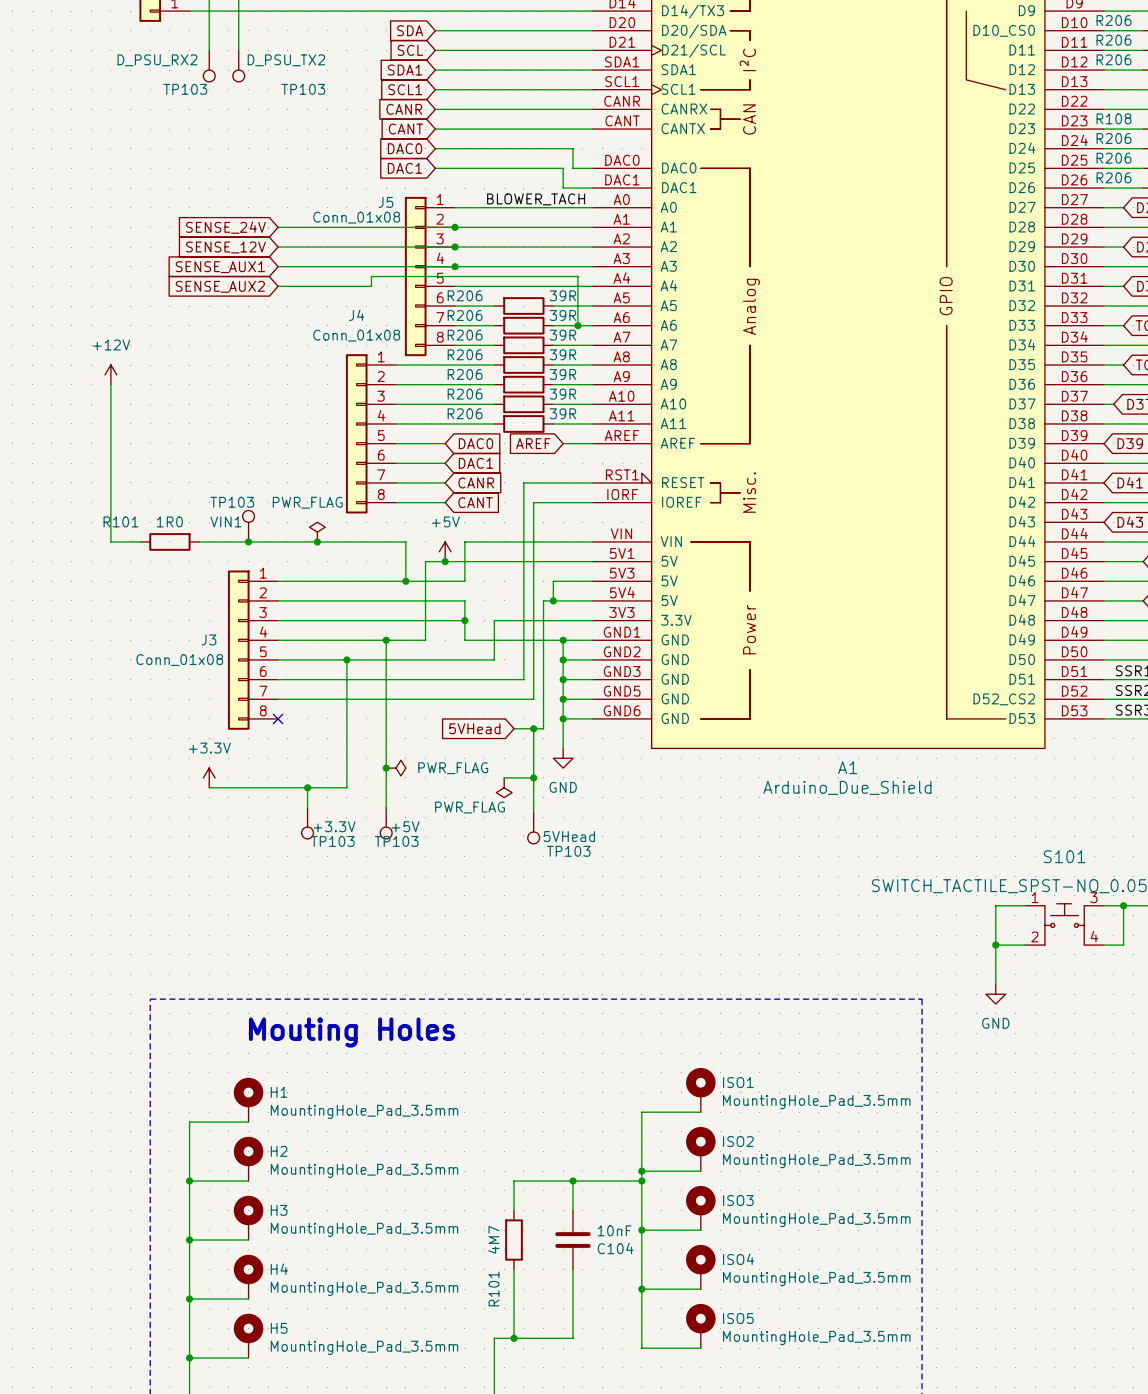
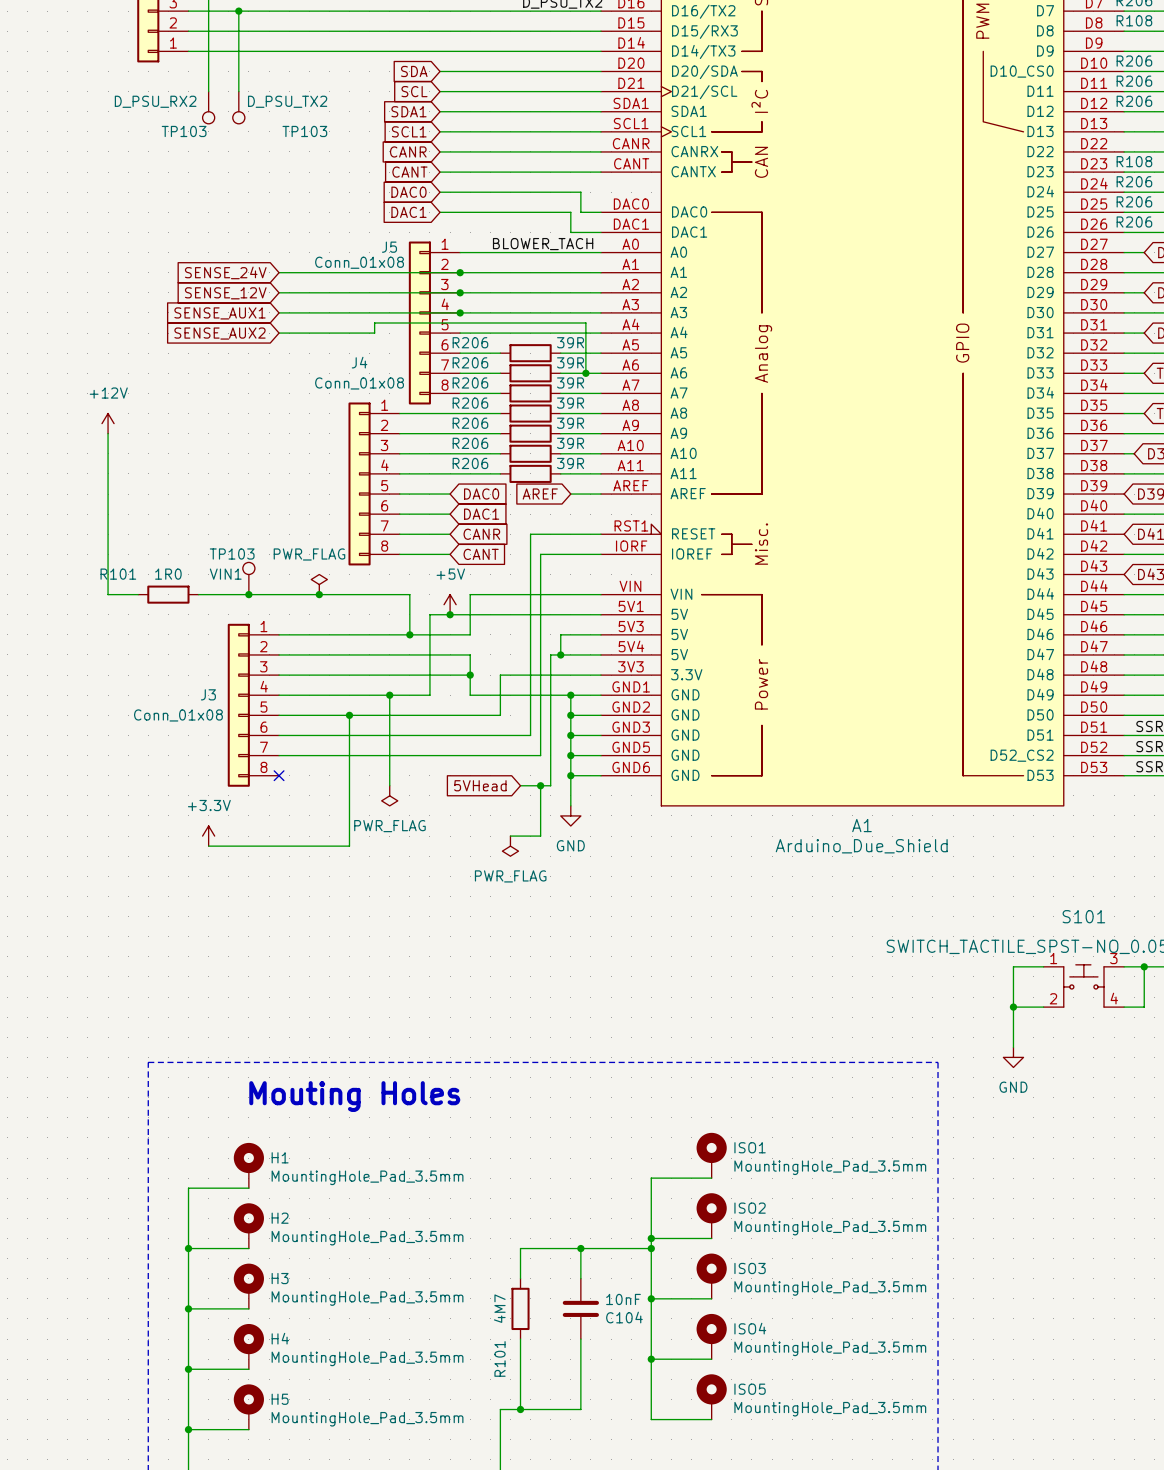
wire: (386, 728) (386, 807) -> none
junction: (386, 768) -> none
power symbol rotation: 0° (396, 768) -> 90° clockwise (389, 795)
power symbol position: PWR_FLAG (396, 768) -> PWR_FLAG (389, 795)
power symbol text position: PWR_FLAG (453, 768) -> PWR_FLAG (389, 826)
wire: (533, 777) (533, 812) -> none
junction: (533, 777) -> none
wire: (307, 787) (307, 807) -> none
junction: (307, 787) -> none
power symbol text position: PWR_FLAG (470, 807) -> PWR_FLAG (510, 876)
TP103: +3.3V (307, 823) -> none
TP103: +5V (386, 823) -> none
TP103: 5VHead (533, 828) -> none

